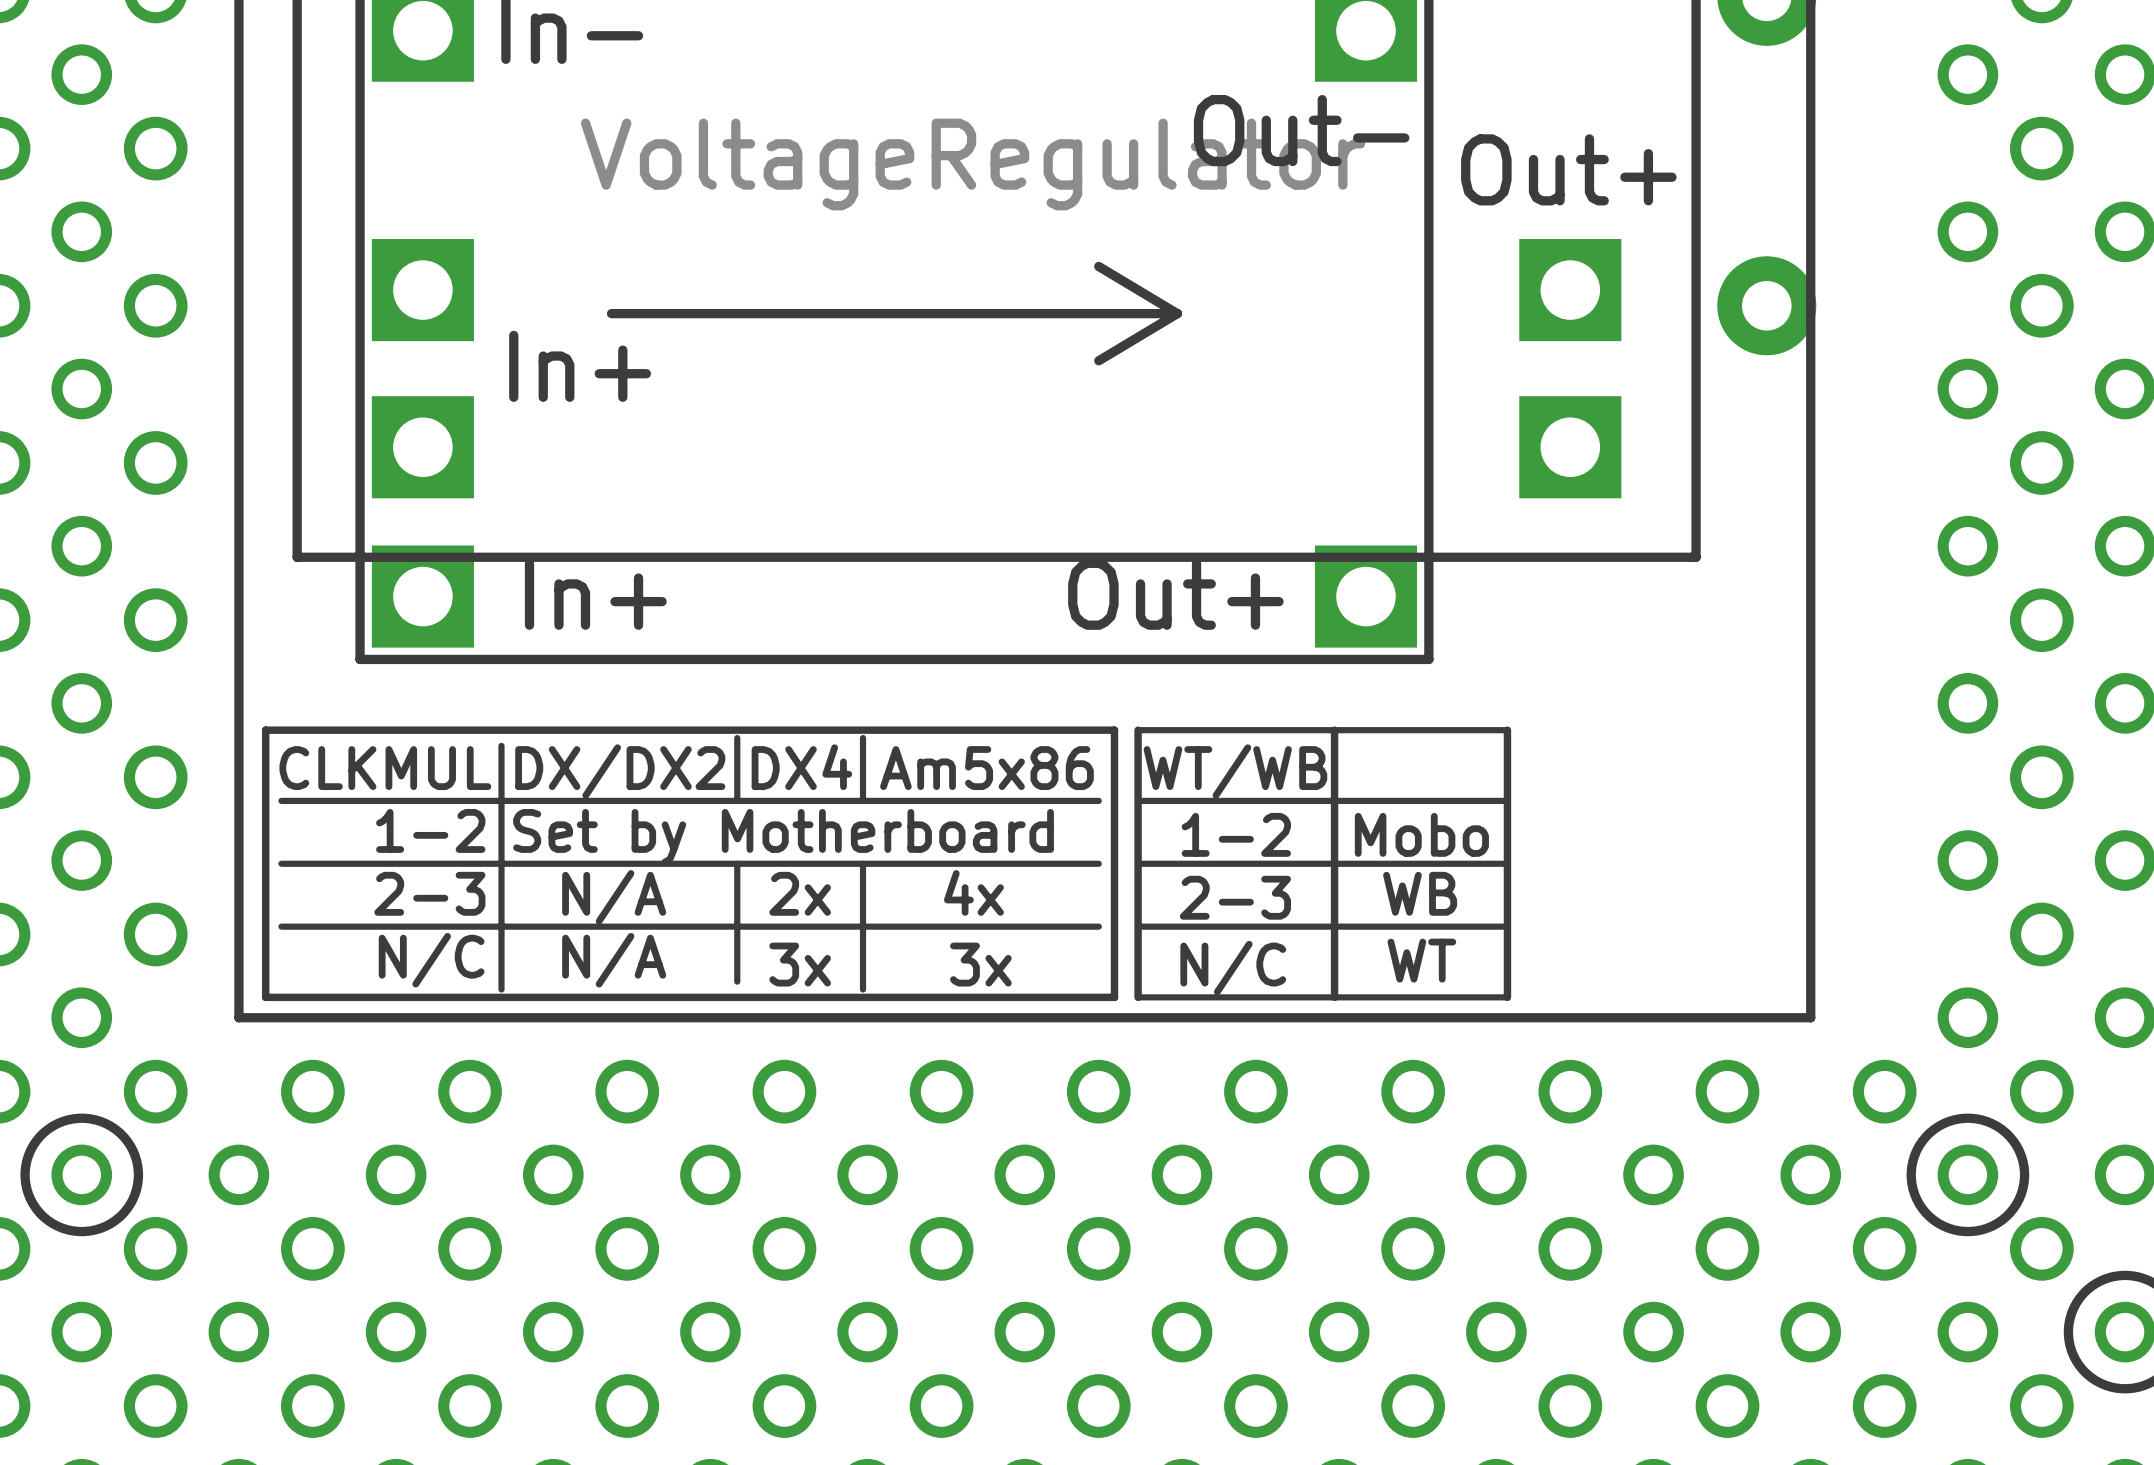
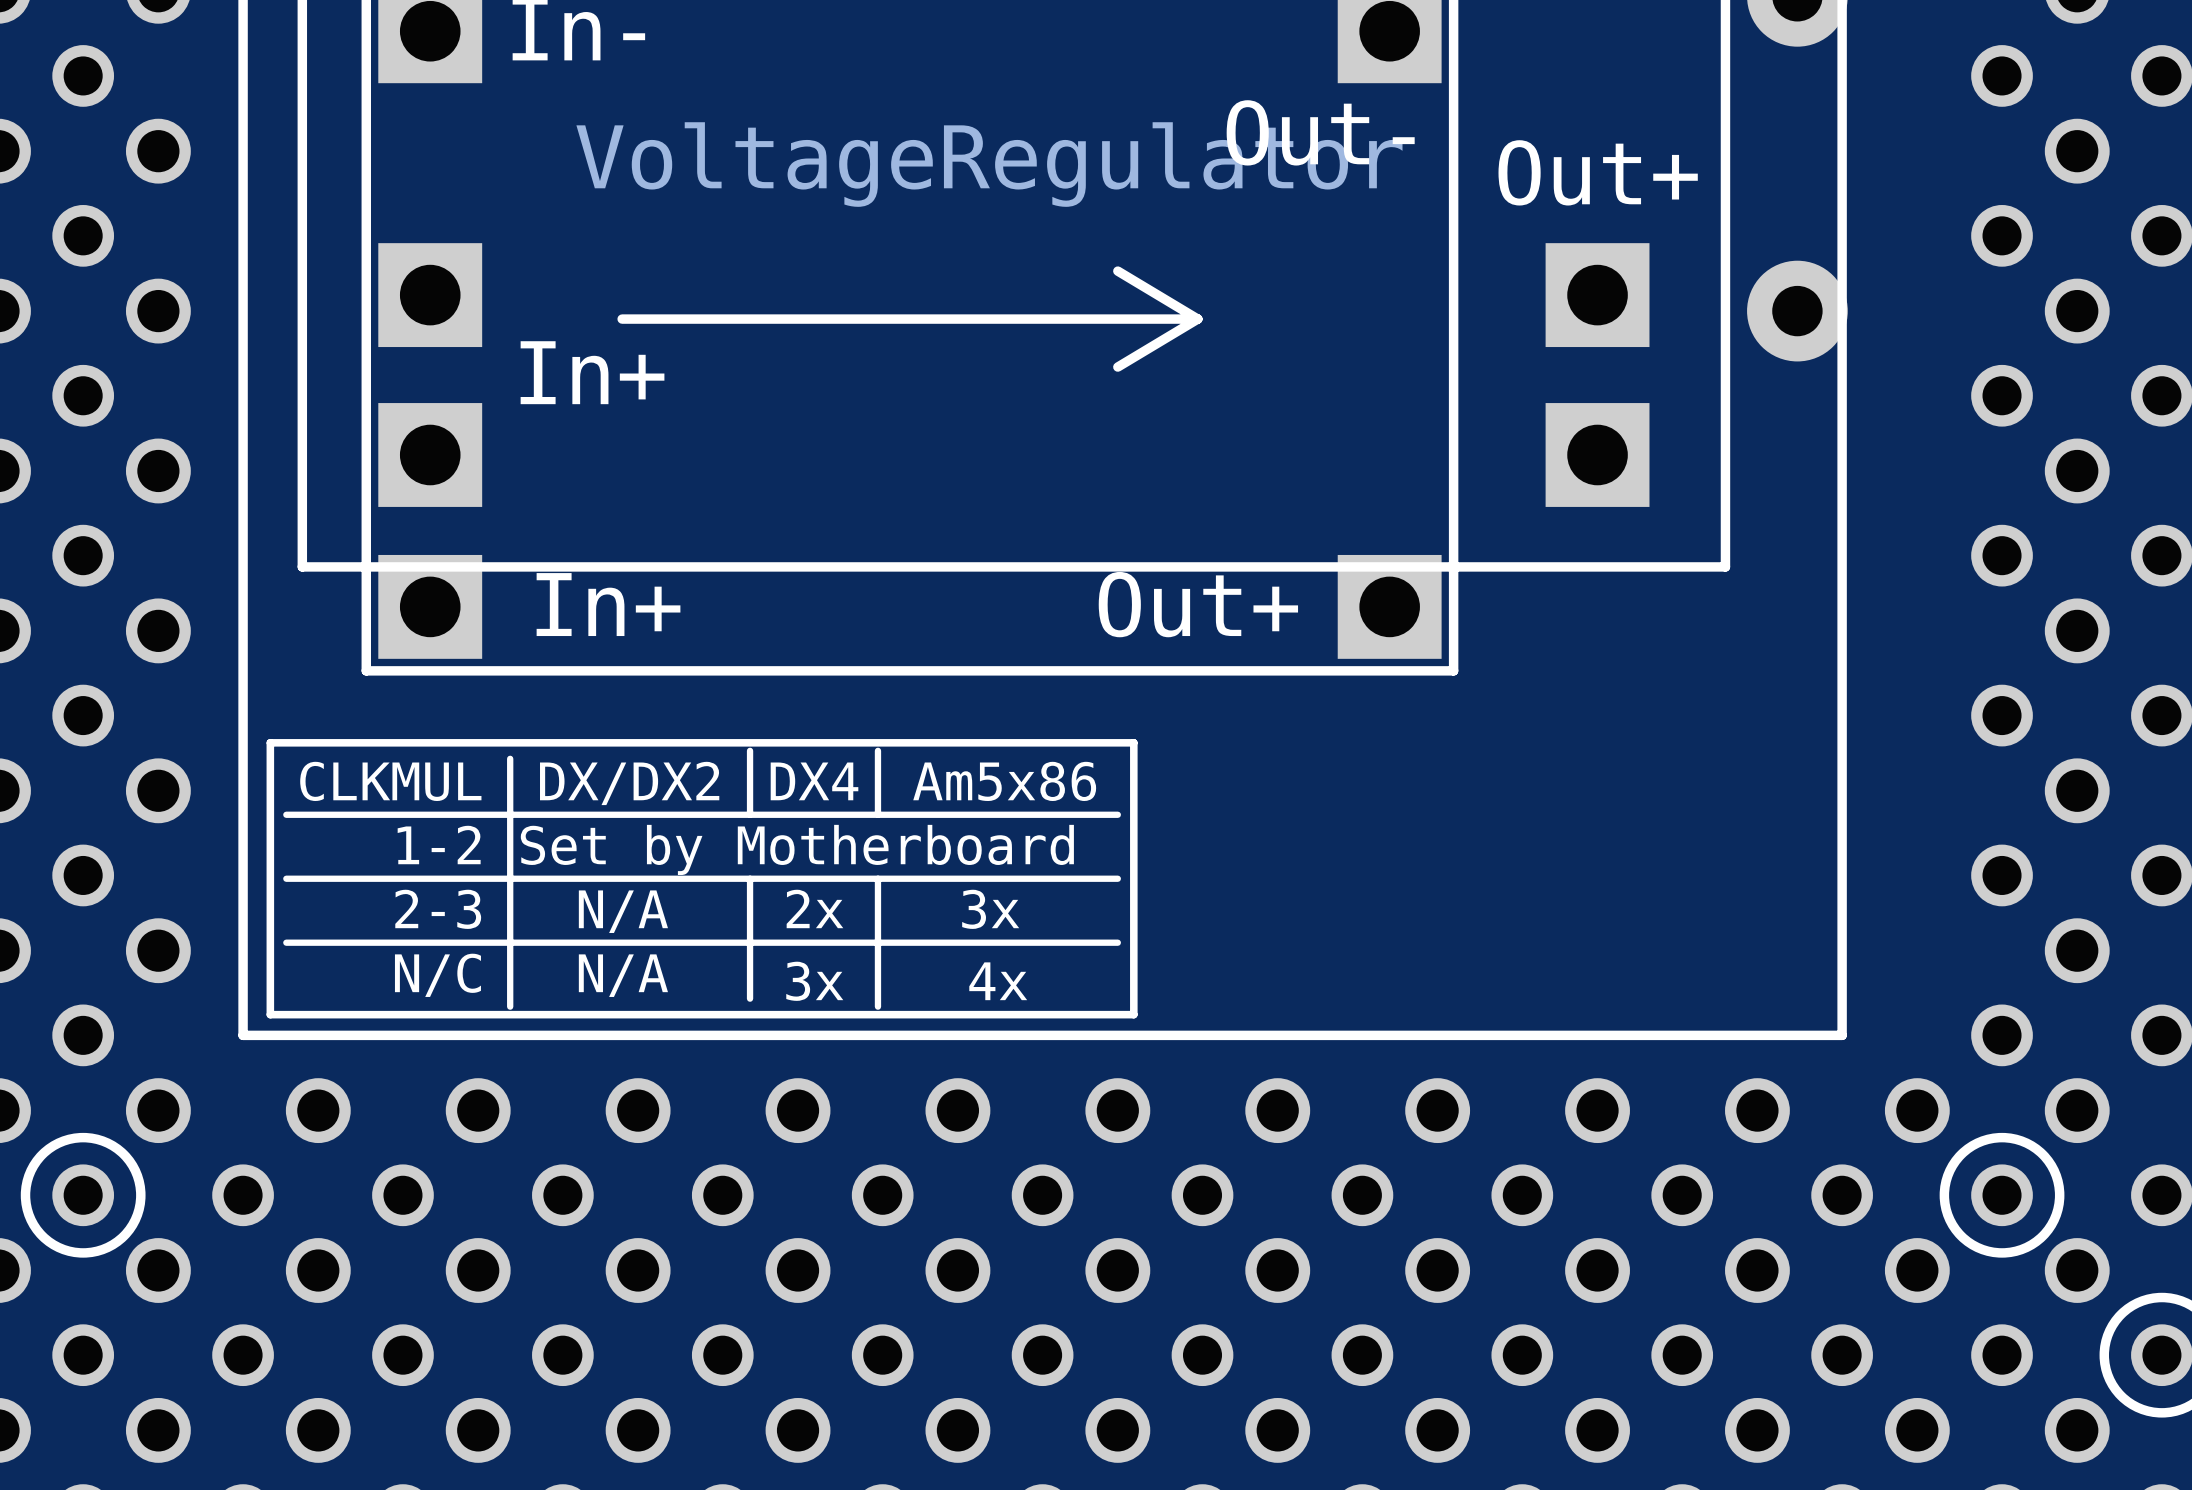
line: (1138, 730) (1507, 730) (1507, 997) (1138, 997) (1138, 730) -> none
line: (1334, 730) (1334, 997) -> none
text: WT/WB (1235, 771) -> none
line: (1138, 800) (1507, 800) -> none
text: 1-2 (1236, 834) -> none
text: Mobo (1421, 834) -> none
line: (1138, 863) (1507, 863) -> none
text: 4x (973, 892) -> 3x (990, 909)
text: WB (1420, 893) -> none
text: 2-3 (1235, 897) -> none
line: (1138, 926) (1507, 926) -> none
text: WT (1421, 960) -> none
text: 3x (980, 964) -> 4x (998, 981)
text: N/C (1233, 968) -> none

